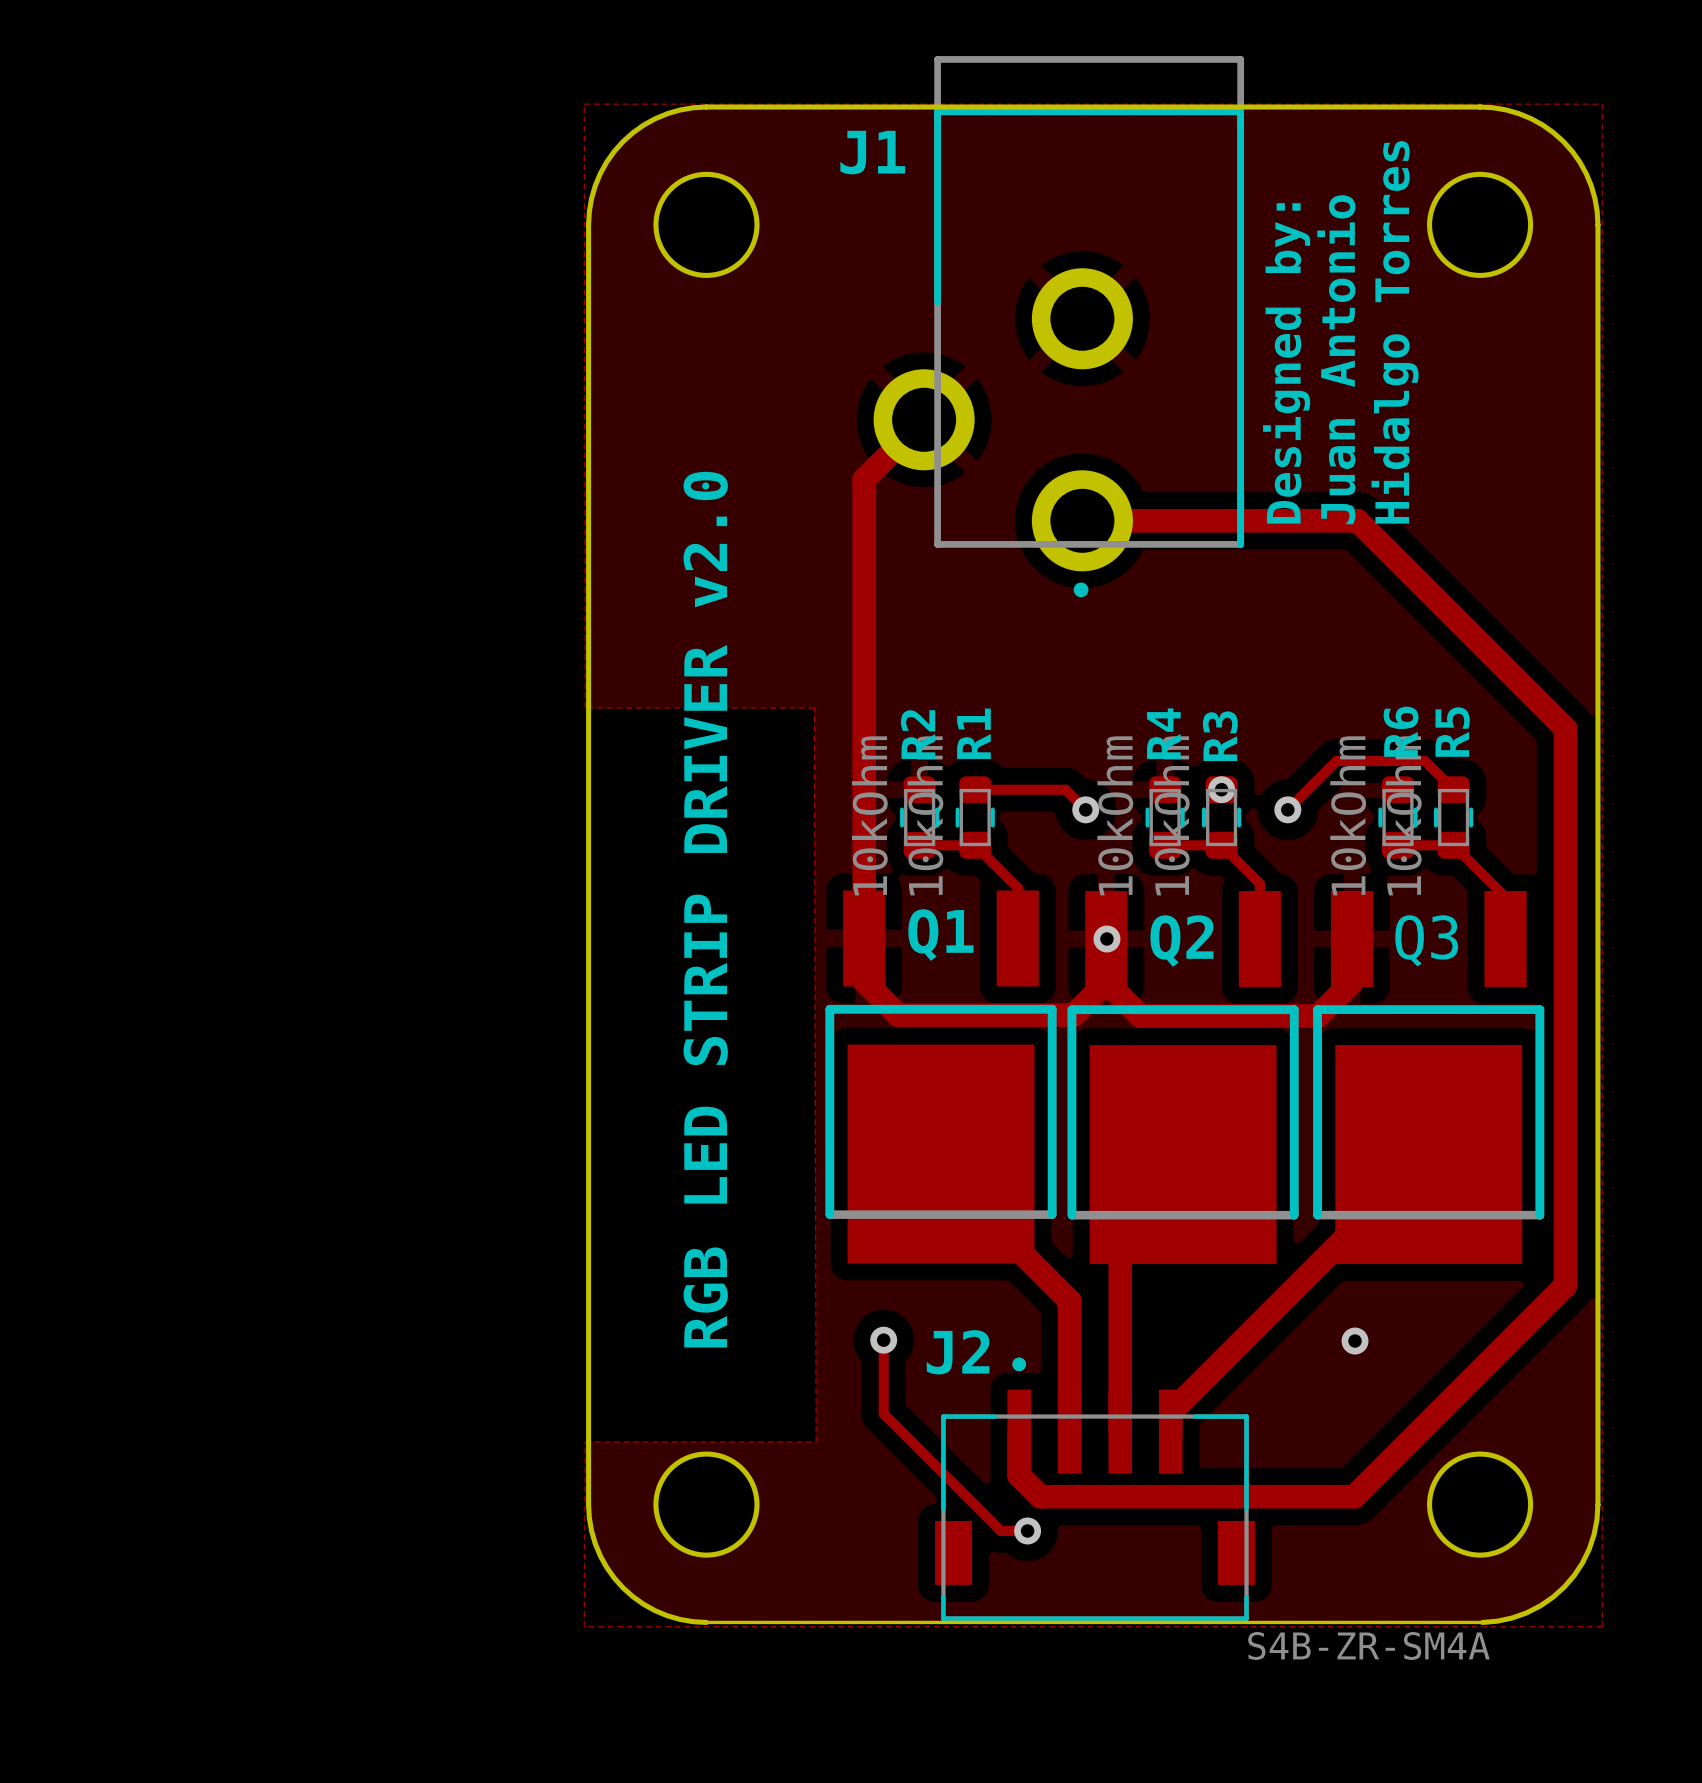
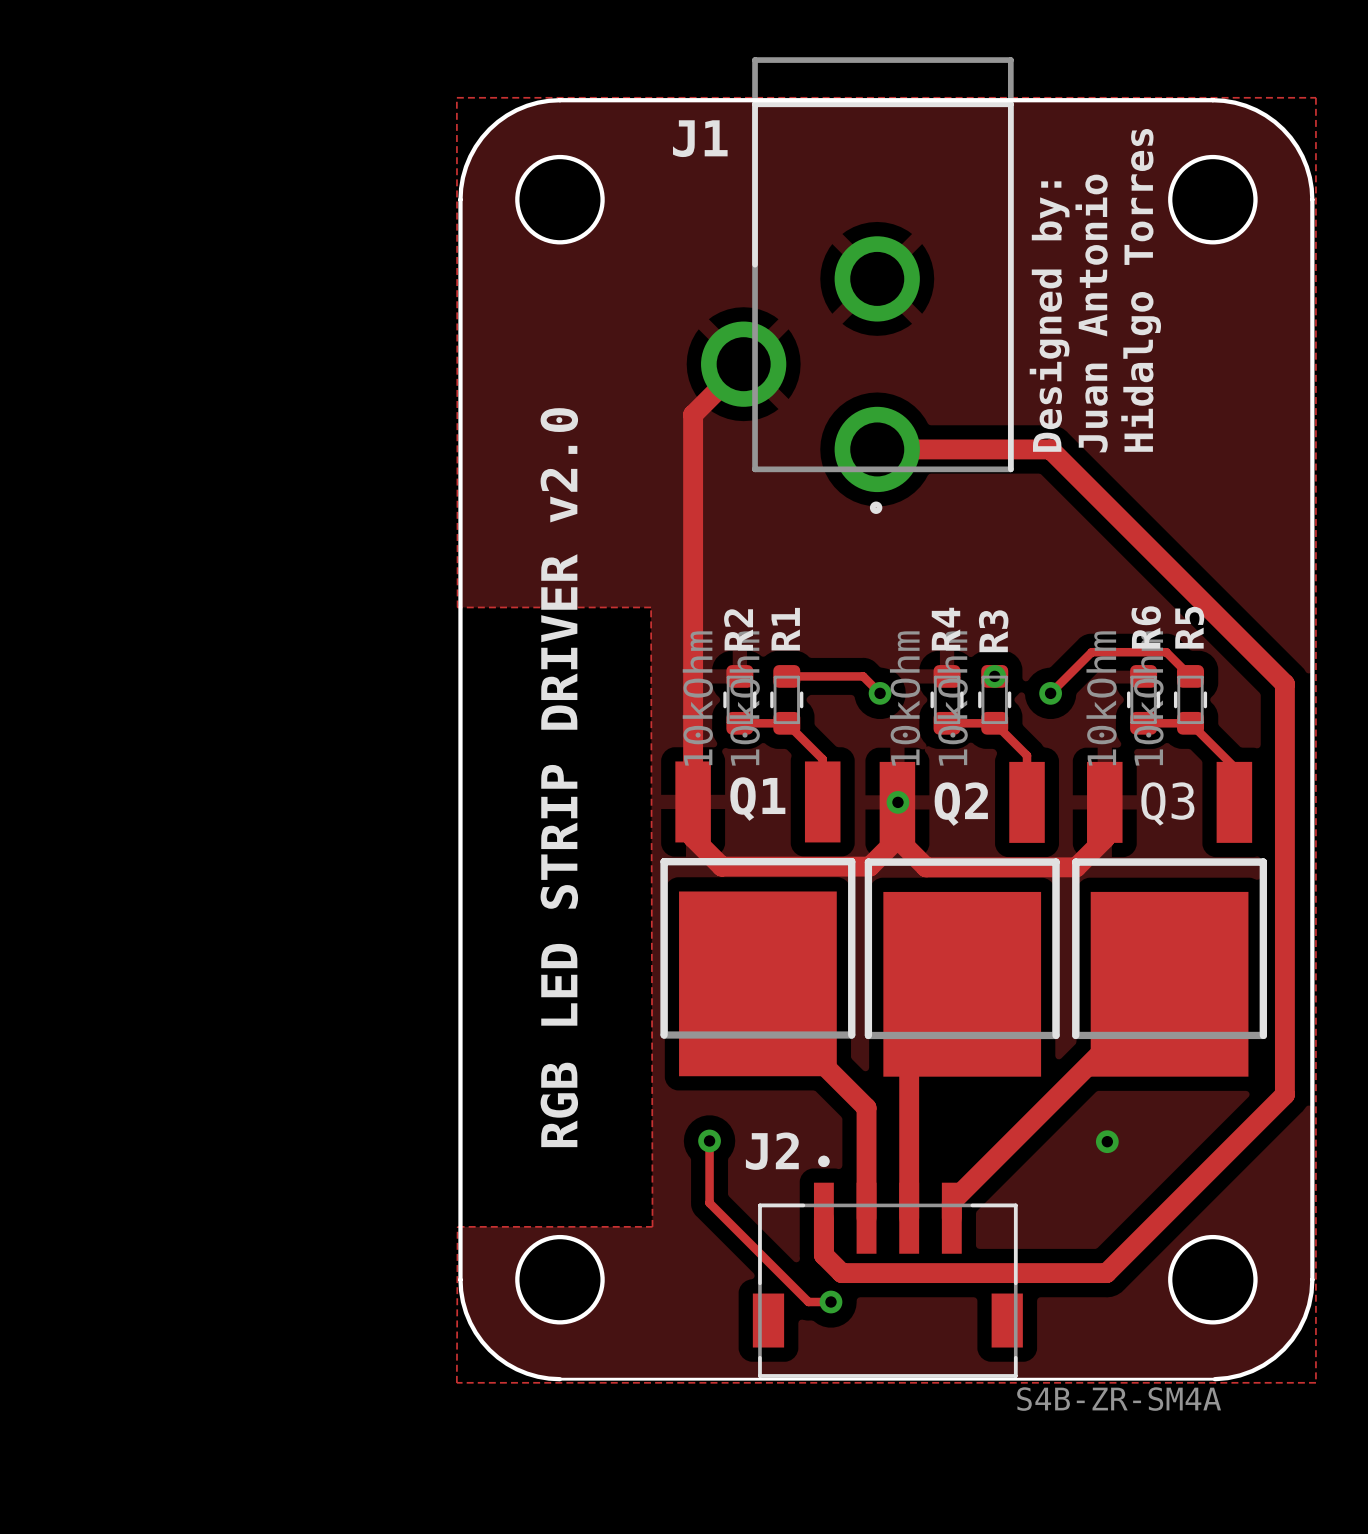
track: (1287, 520) (1357, 520) (1565, 728) (1565, 798) -> (1050, 449) (1284, 683)

